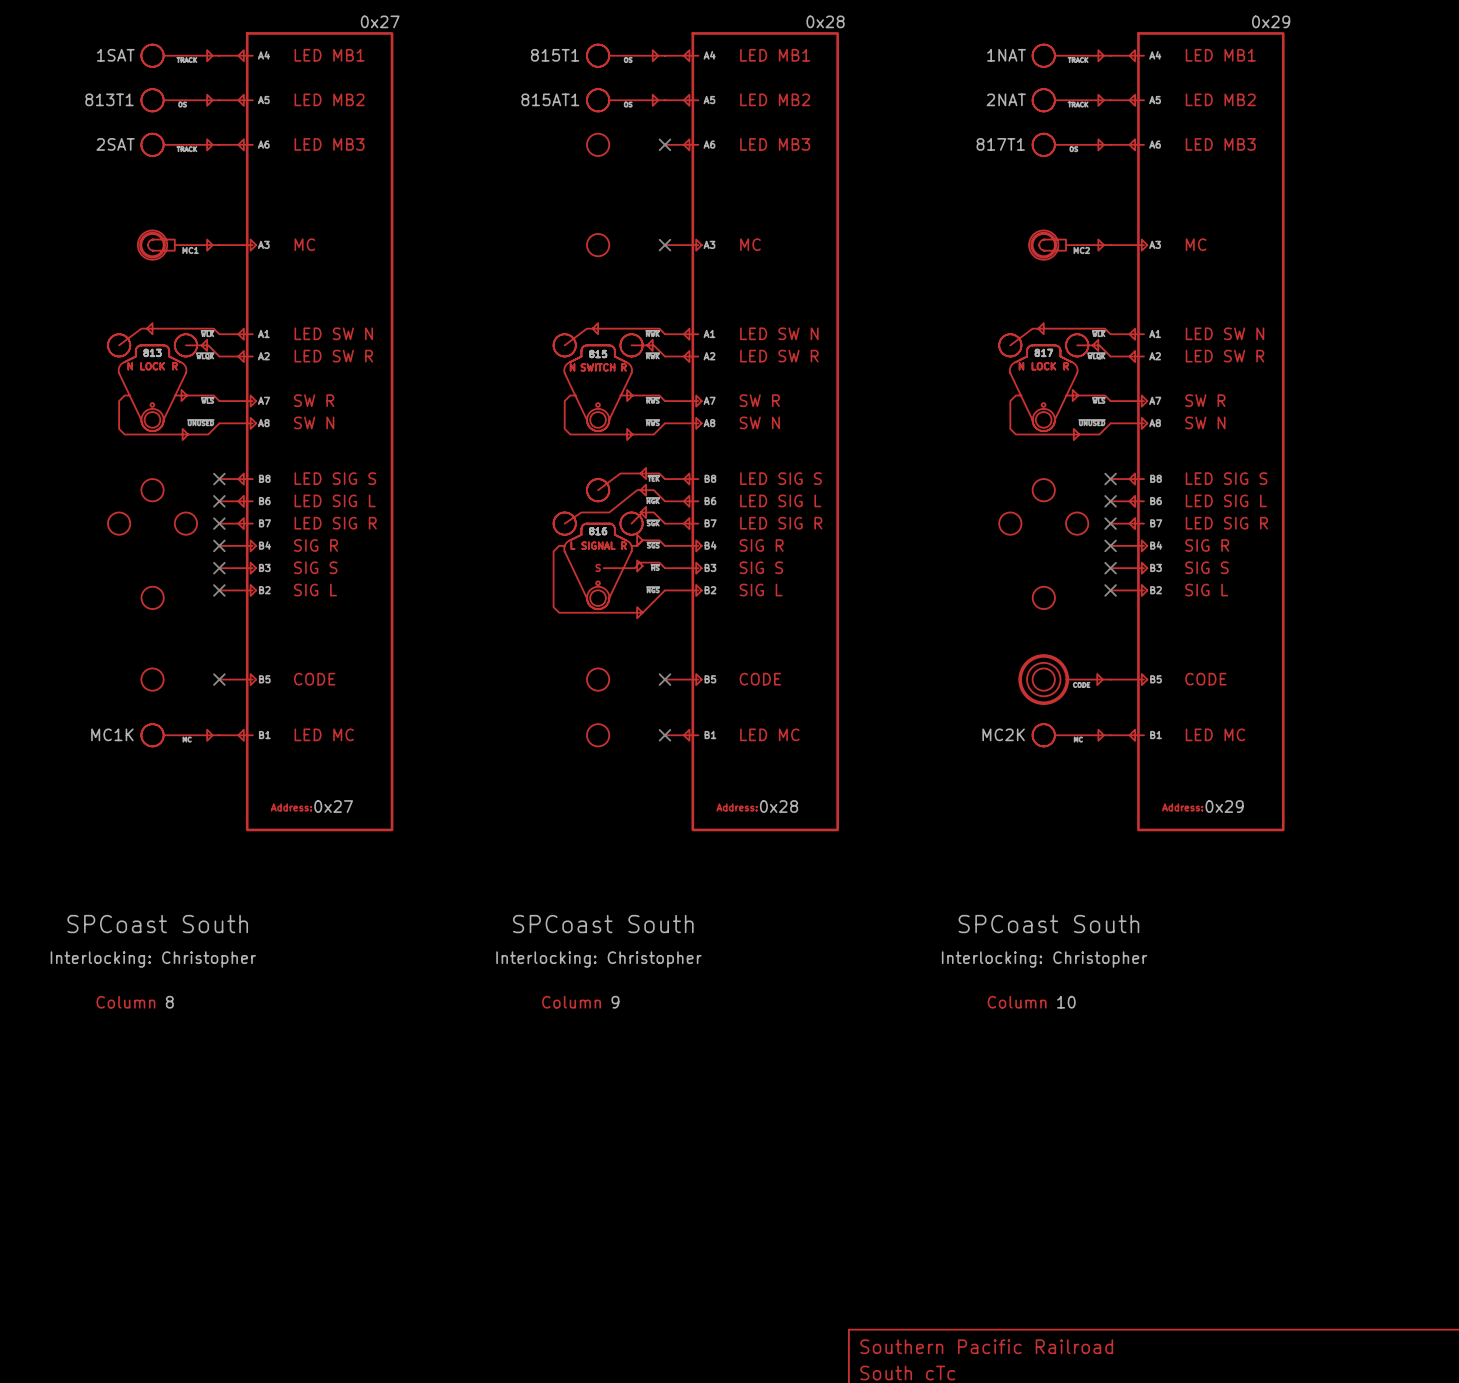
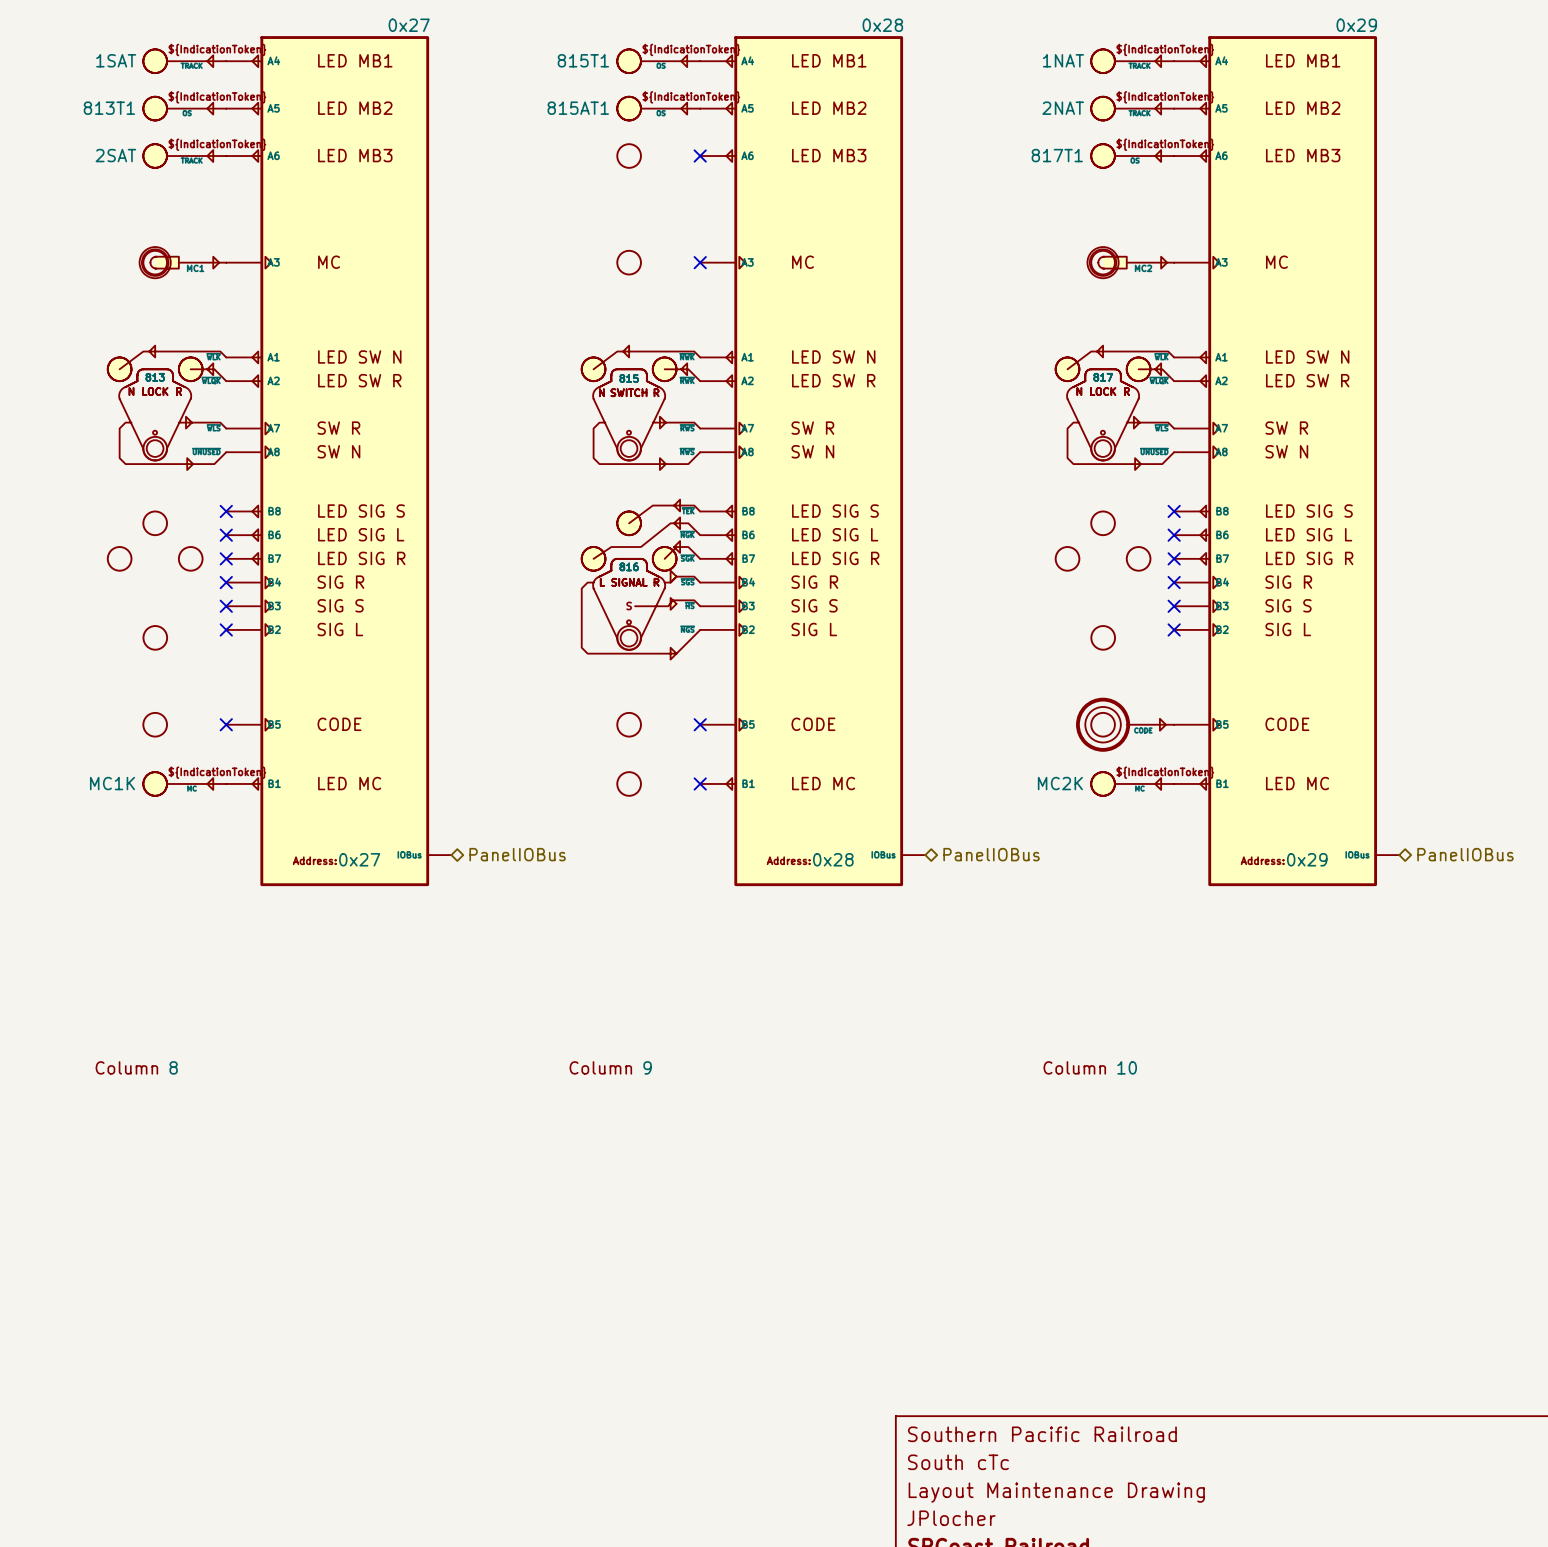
part symbol: [140, 43, 220, 68] -> [142, 48, 227, 75]
part symbol: [586, 43, 665, 68] -> [616, 48, 701, 75]
part symbol: [1031, 43, 1111, 68] -> [1090, 48, 1175, 75]
part symbol: [140, 88, 220, 113] -> [142, 95, 227, 122]
part symbol: [586, 88, 665, 113] -> [616, 95, 701, 122]
part symbol: [1031, 88, 1111, 113] -> [1090, 95, 1175, 122]
part symbol: [140, 132, 220, 157] -> [142, 143, 227, 169]
part symbol: [1031, 132, 1111, 157] -> [1090, 143, 1175, 169]
part: 0x27 (306, 431) -> none
part: none -> 0x27 (338, 461)
part: 0x28 (751, 431) -> none
part: none -> 0x28 (812, 461)
part: 0x29 (1197, 431) -> none
part: none -> 0x29 (1286, 461)
part symbol: [140, 723, 220, 748] -> [142, 771, 227, 797]
part symbol: [1031, 723, 1111, 748] -> [1090, 771, 1175, 797]
hierarchical label: none -> PanelIOBus (517, 854)
hierarchical label: none -> PanelIOBus (991, 854)
hierarchical label: none -> PanelIOBus (1465, 854)
part text: SPCoast South (157, 924) -> none
part text: SPCoast South (603, 924) -> none
part text: SPCoast South (1048, 924) -> none
part text: Interlocking: Christopher (153, 959) -> none
part text: Interlocking: Christopher (598, 959) -> none
part text: Interlocking: Christopher (1044, 959) -> none

